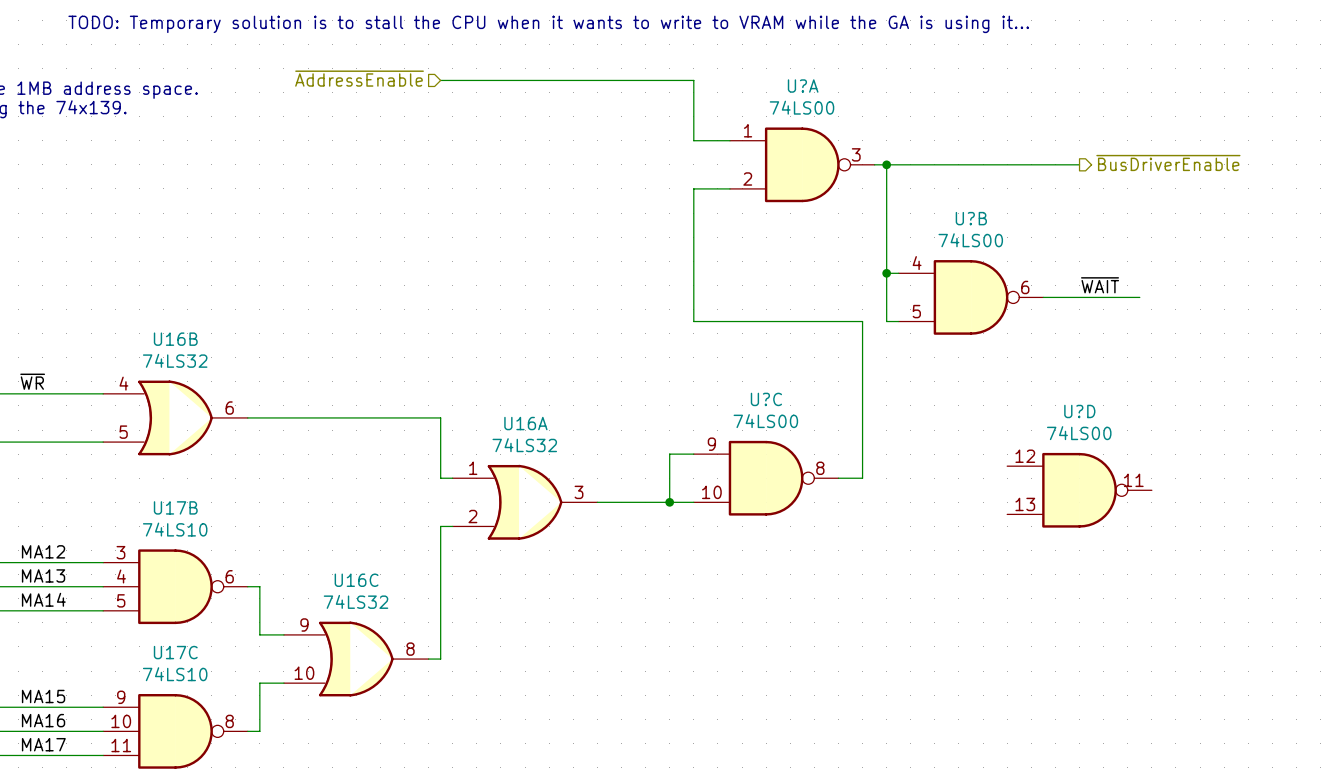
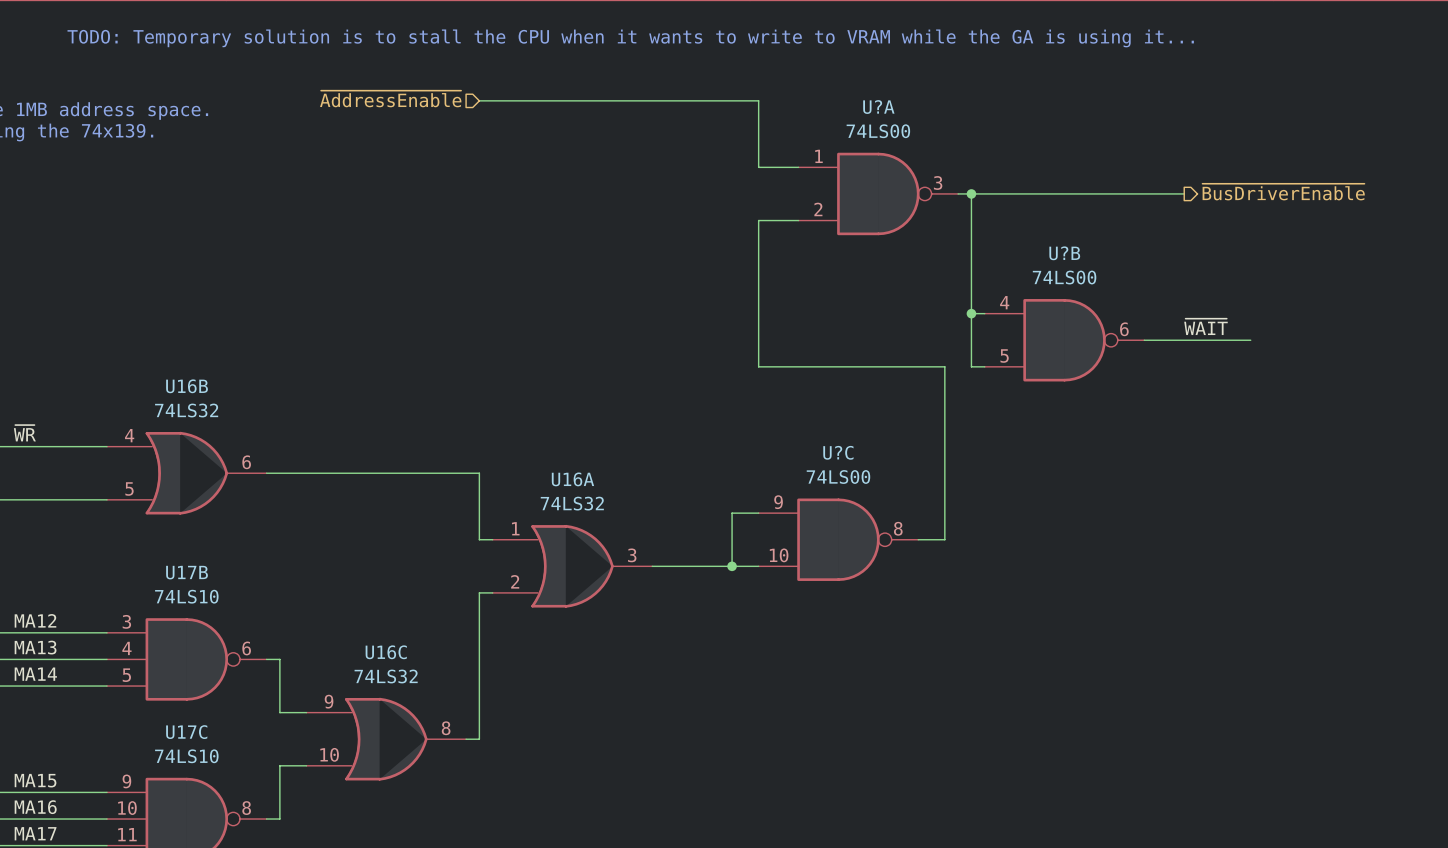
U?D: 74LS00 (1079, 490) -> none

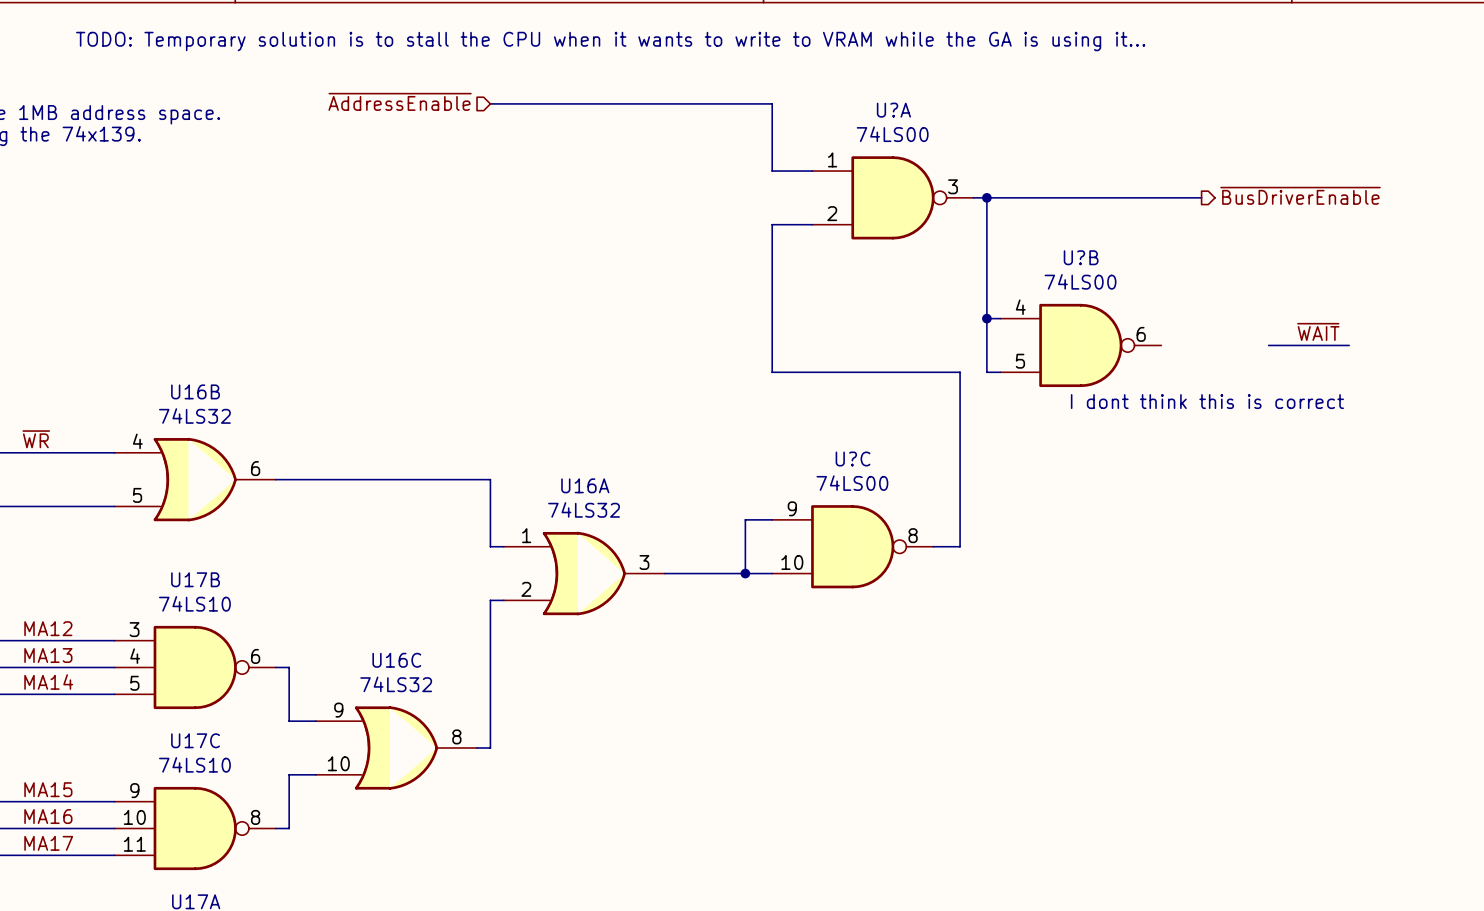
label position: ~{WAIT} (1205, 326) -> ~{WAIT} (1318, 331)
wire: (1144, 340) (1250, 340) -> (1349, 345) (1268, 345)
text: none -> I dont think this is correct (1207, 401)

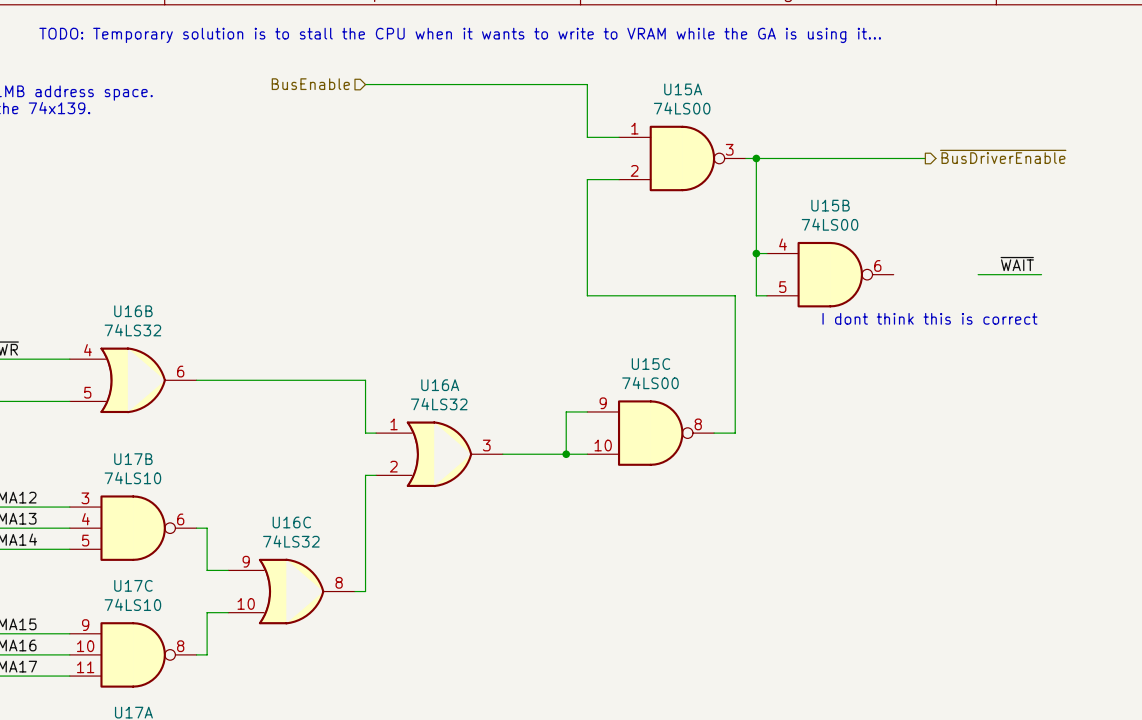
hierarchical label: ~{AddressEnable} (400, 101) -> BusEnable (310, 84)
U?A name: U?A (893, 110) -> U15A (683, 89)
U?B name: U?B (1081, 257) -> U15B (830, 205)
U?C name: U?C (853, 459) -> U15C (650, 364)

